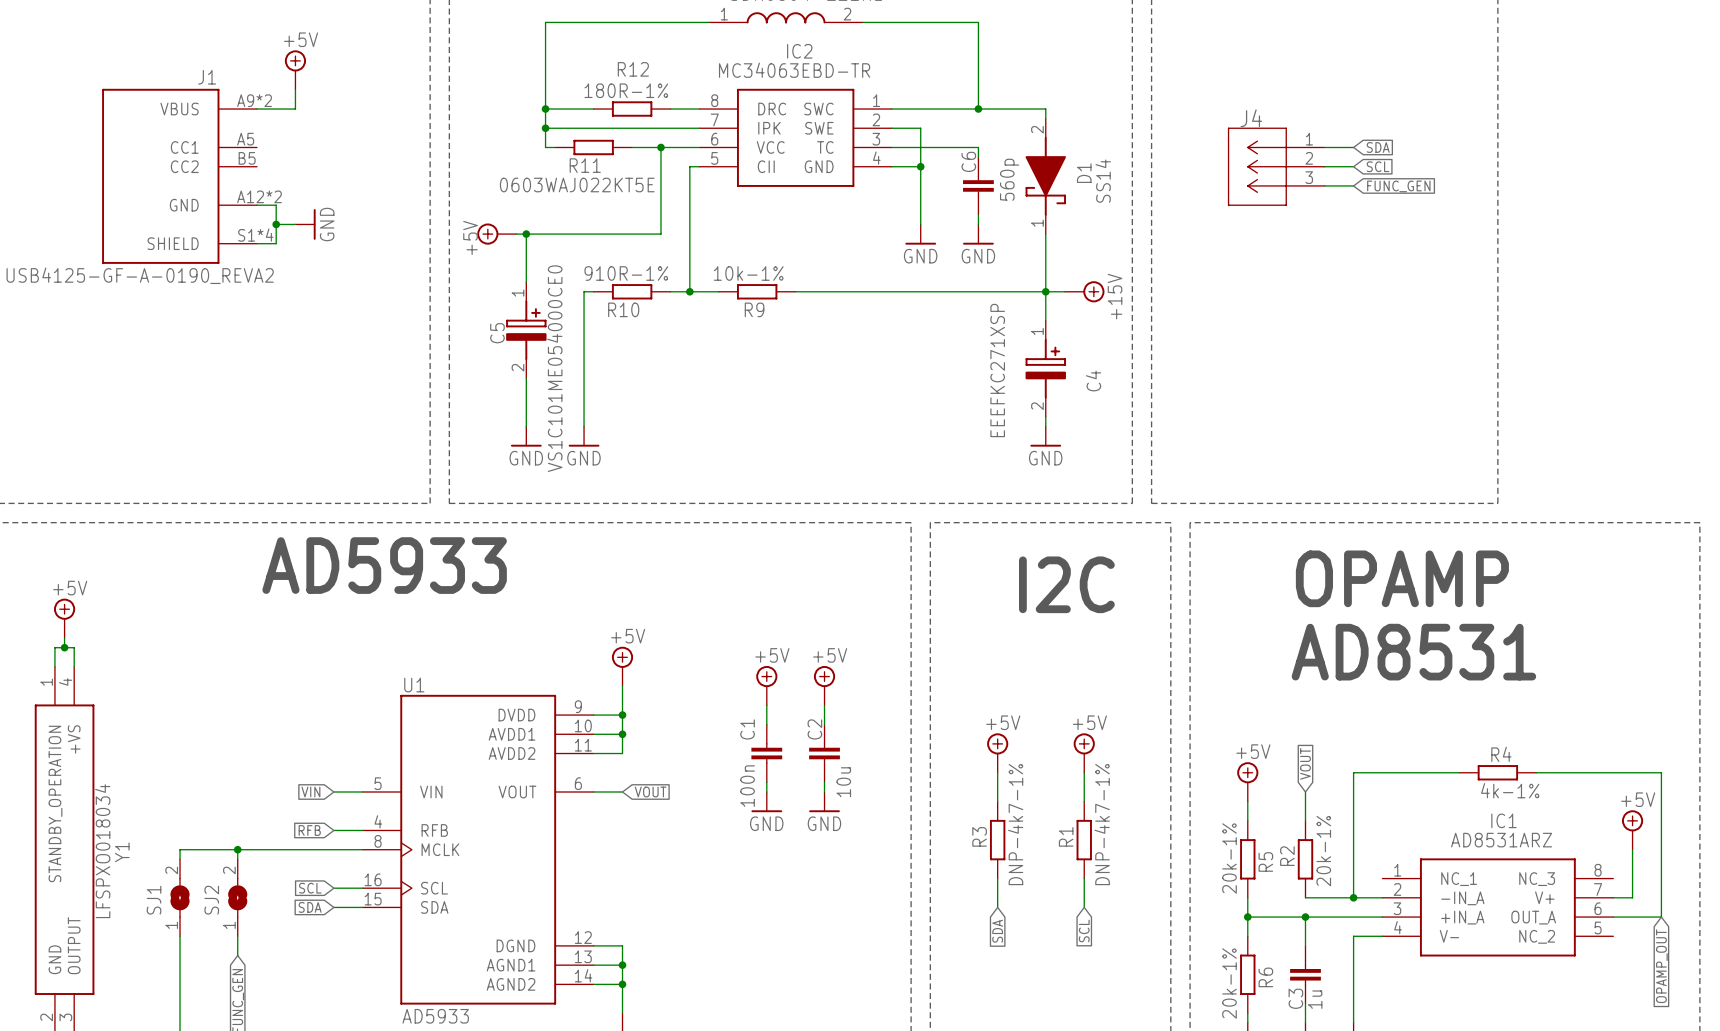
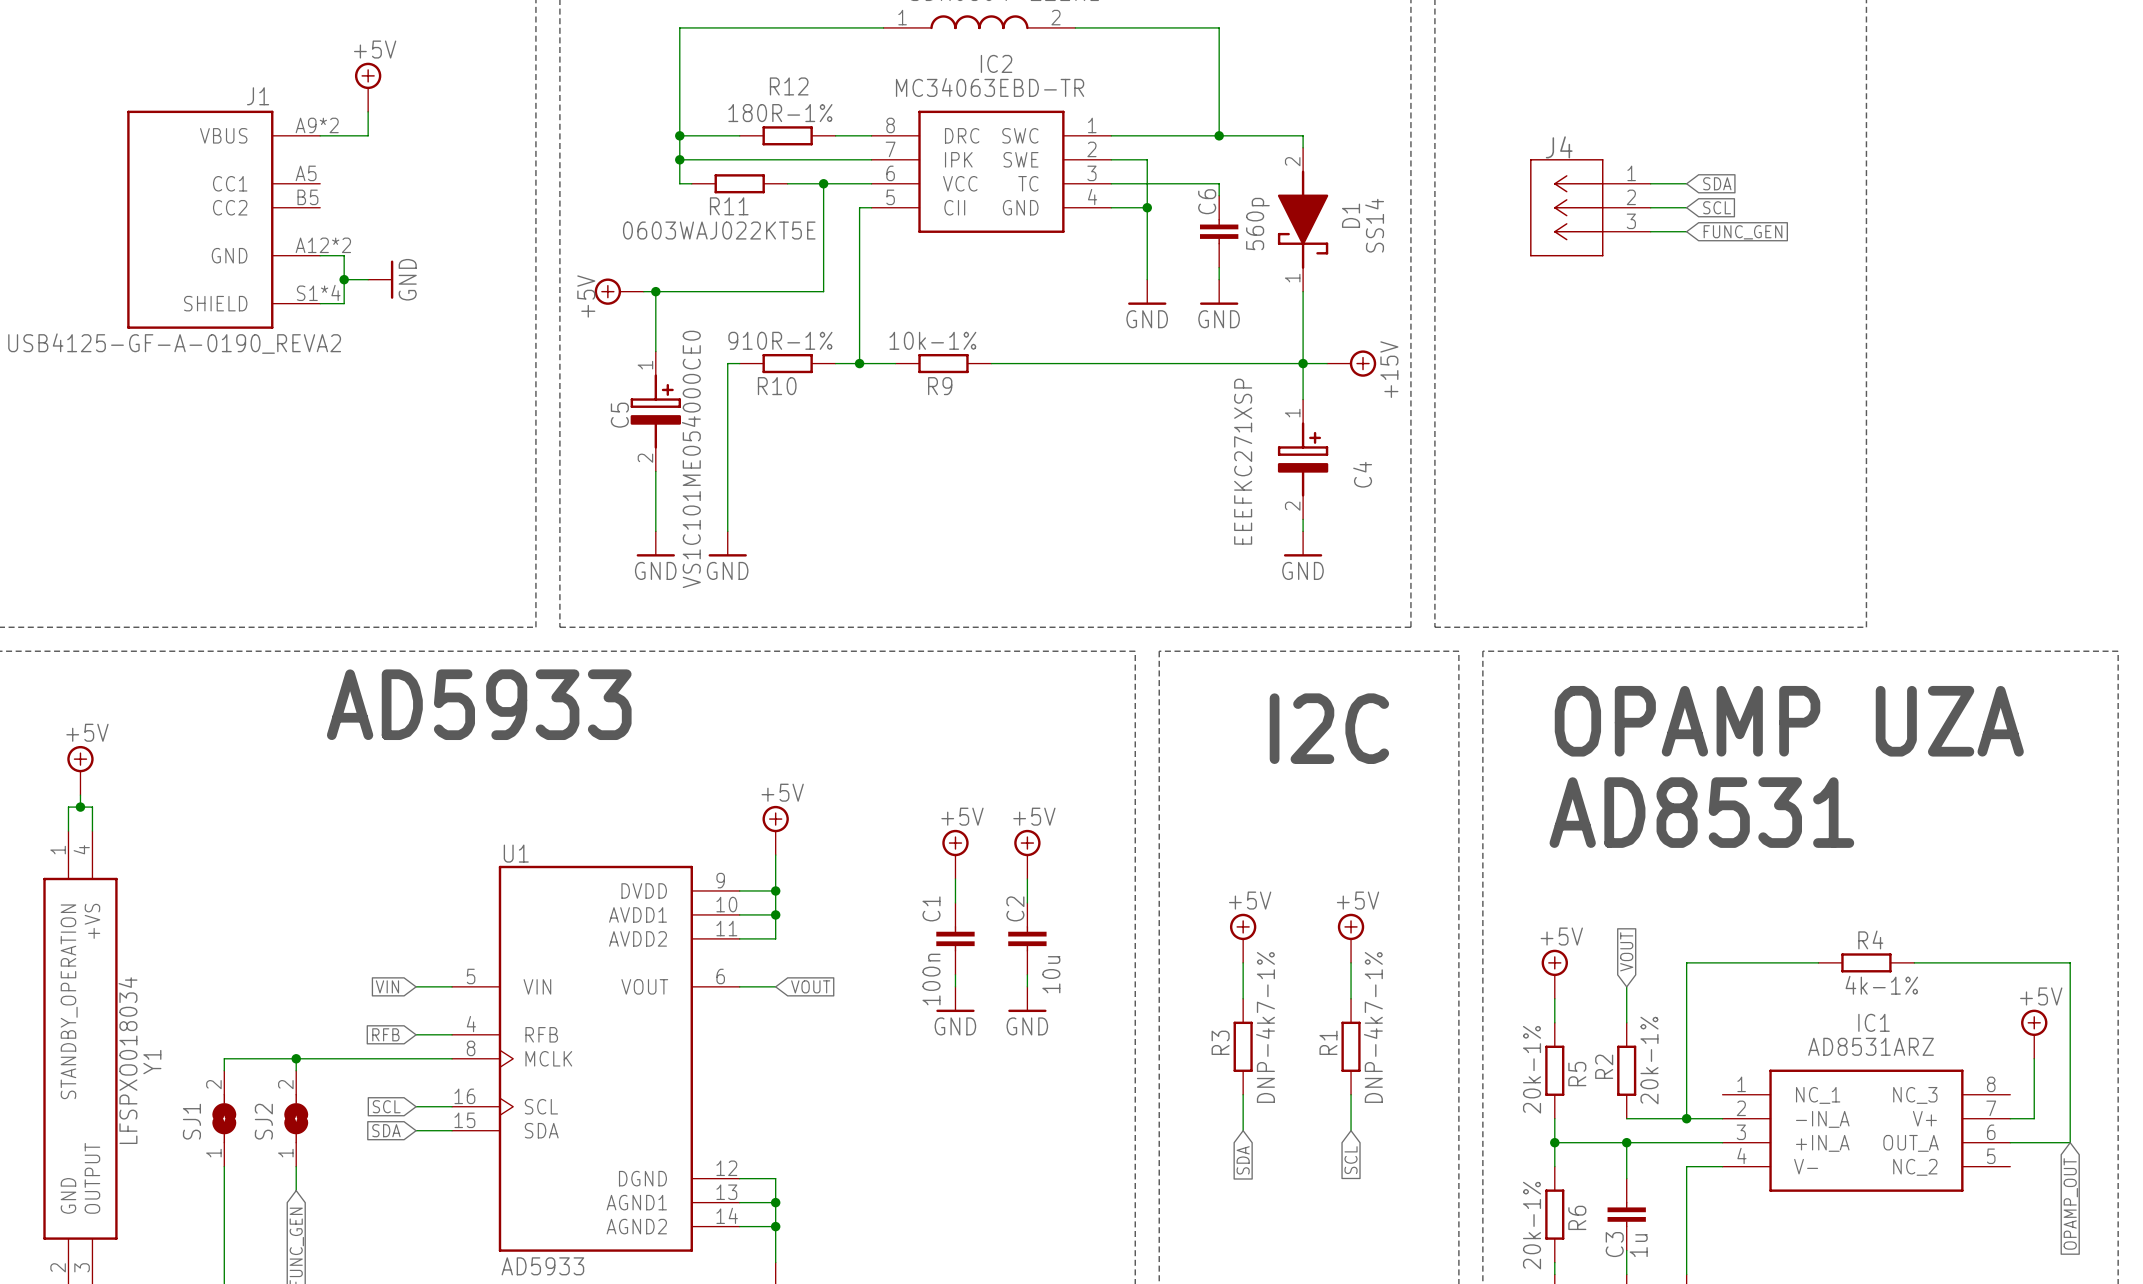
text: OPAMP (1402, 578) -> OPAMP UZA (1789, 721)
text position: AD8531 (1413, 652) -> AD8531 (1701, 812)

